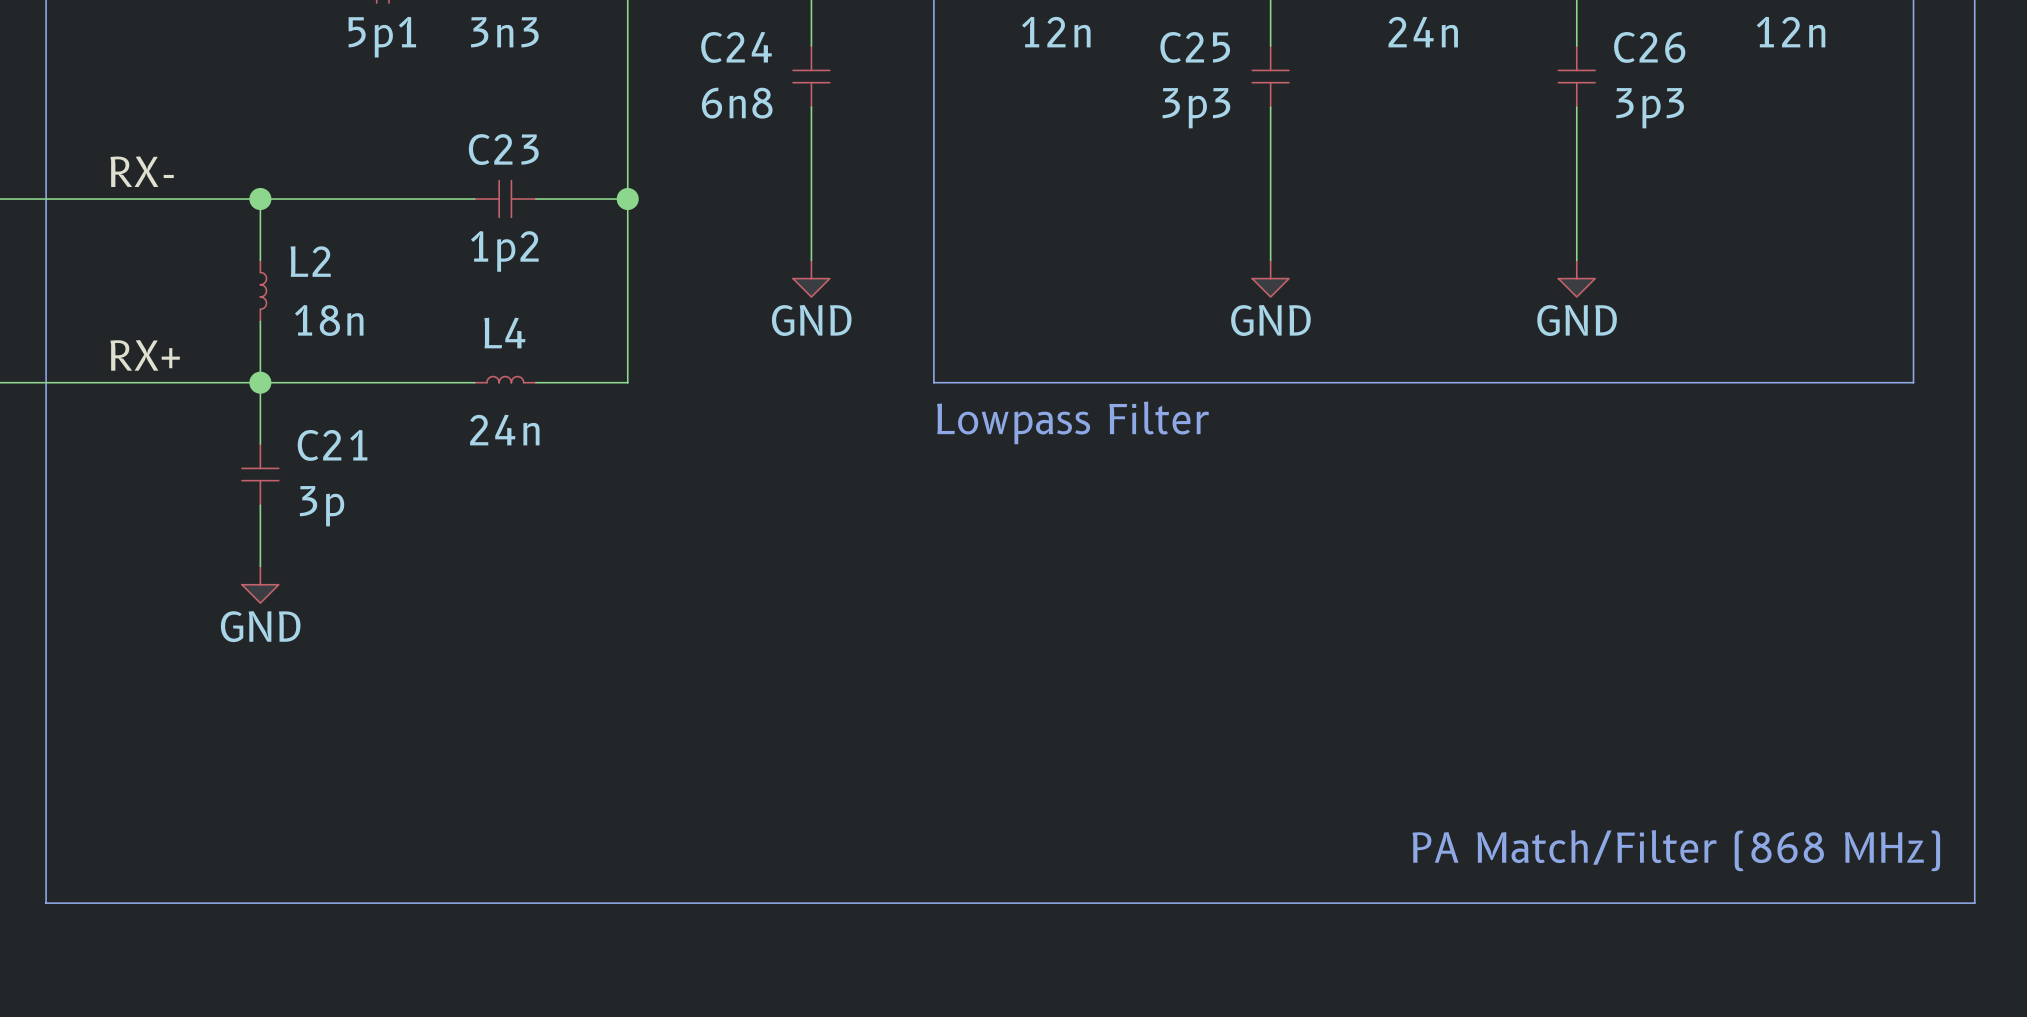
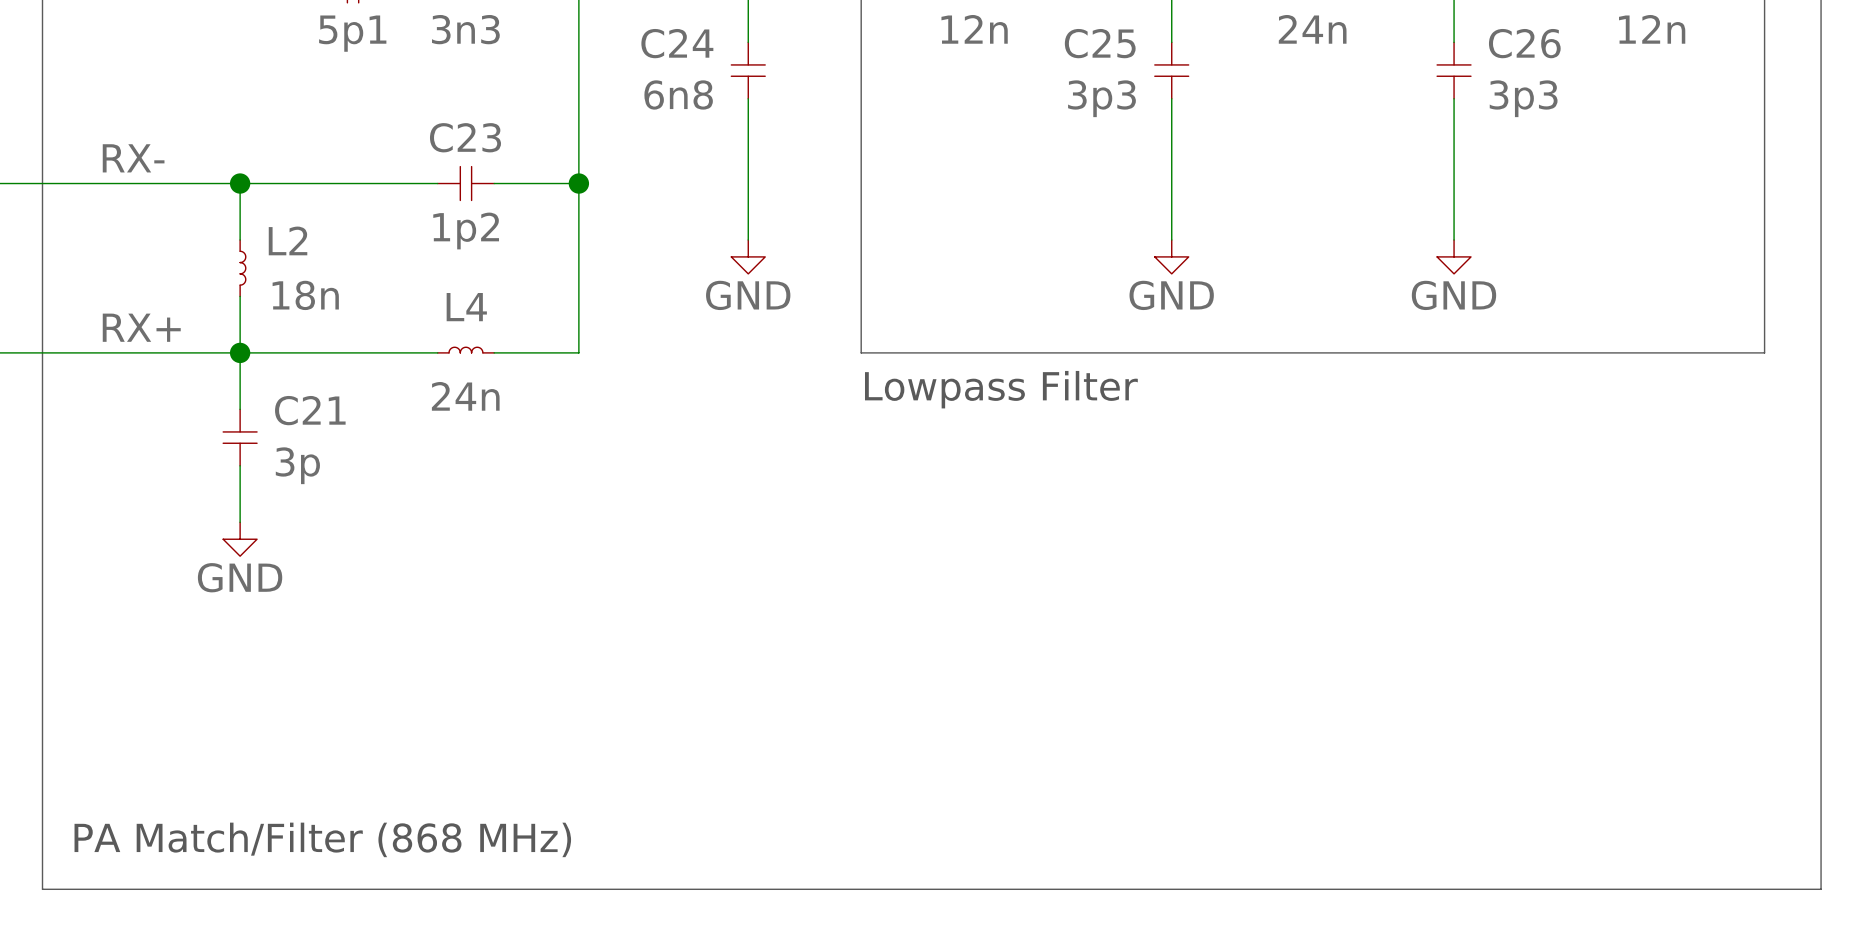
text: PA Match/Filter (868 MHz) (1676, 850) -> none
line: (46, 903) (1974, 903) -> (42, 832) (42, 889) (1821, 889) (1821, 832)
text: none -> PA Match/Filter (868 MHz) (322, 839)

